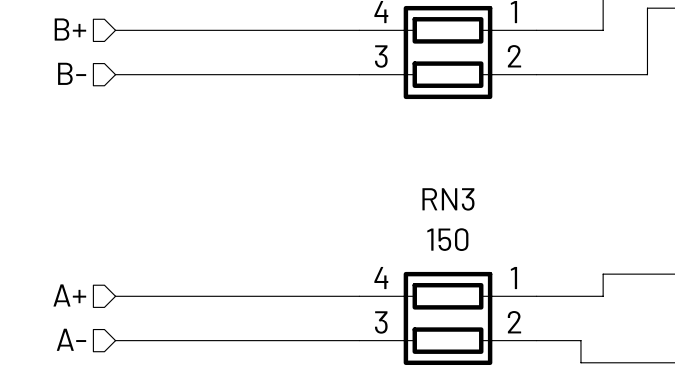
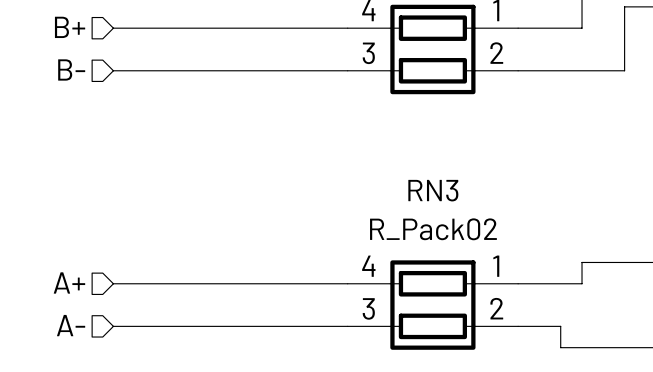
RN3 value: 150 (447, 239) -> R_Pack02 (433, 229)

